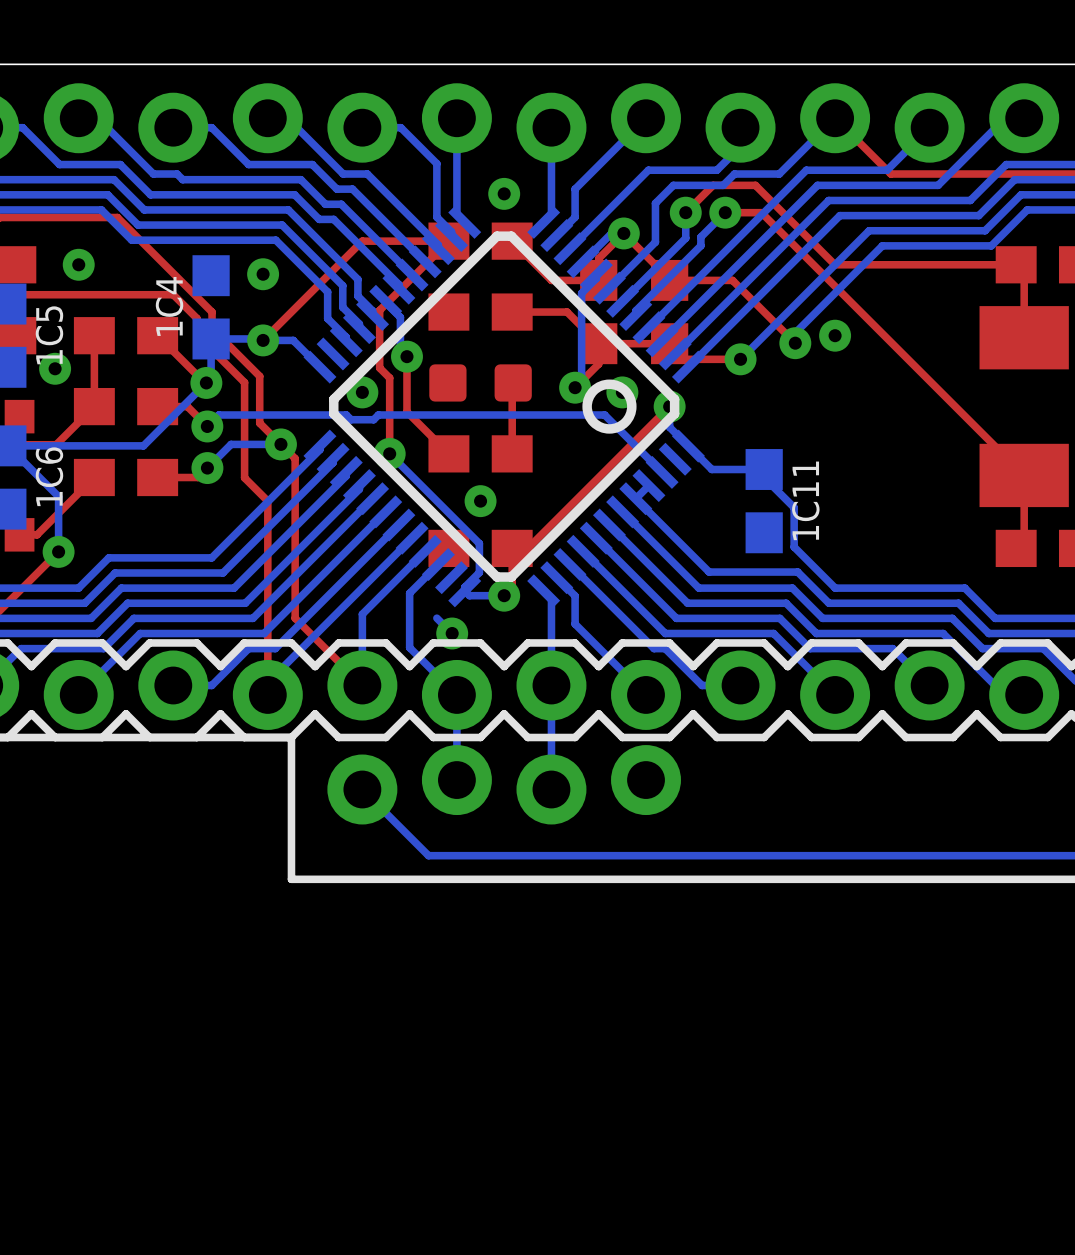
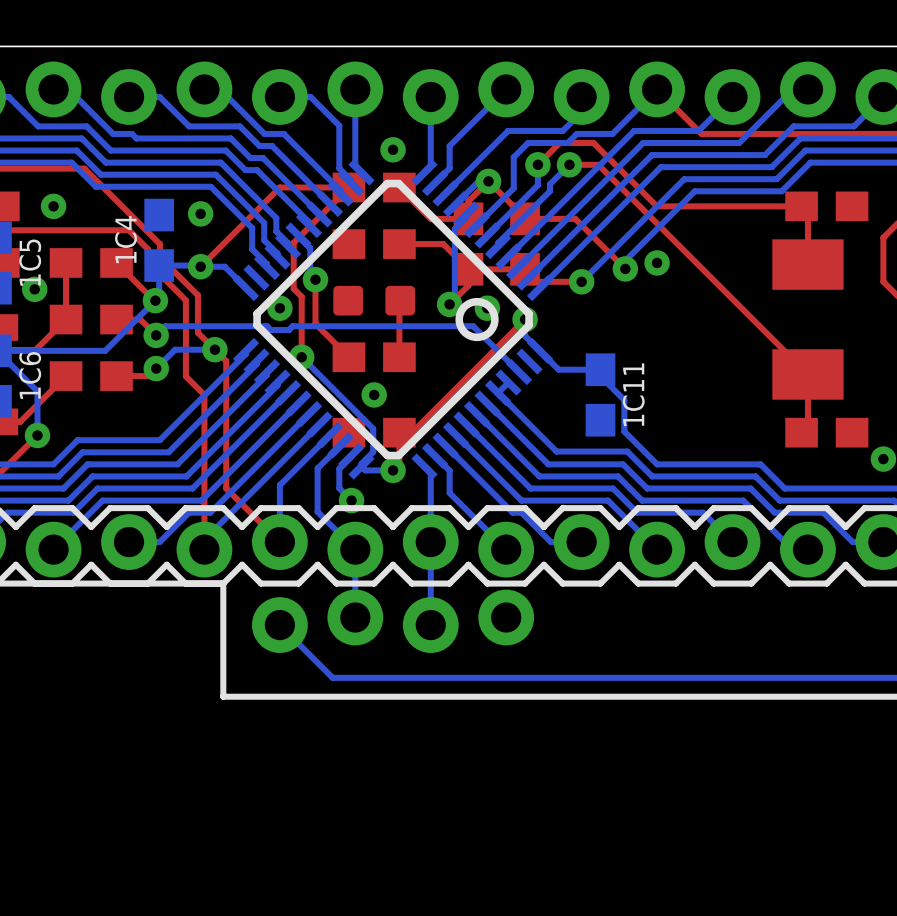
bottom track: none -> (351, 456) (339, 468) (339, 488)

